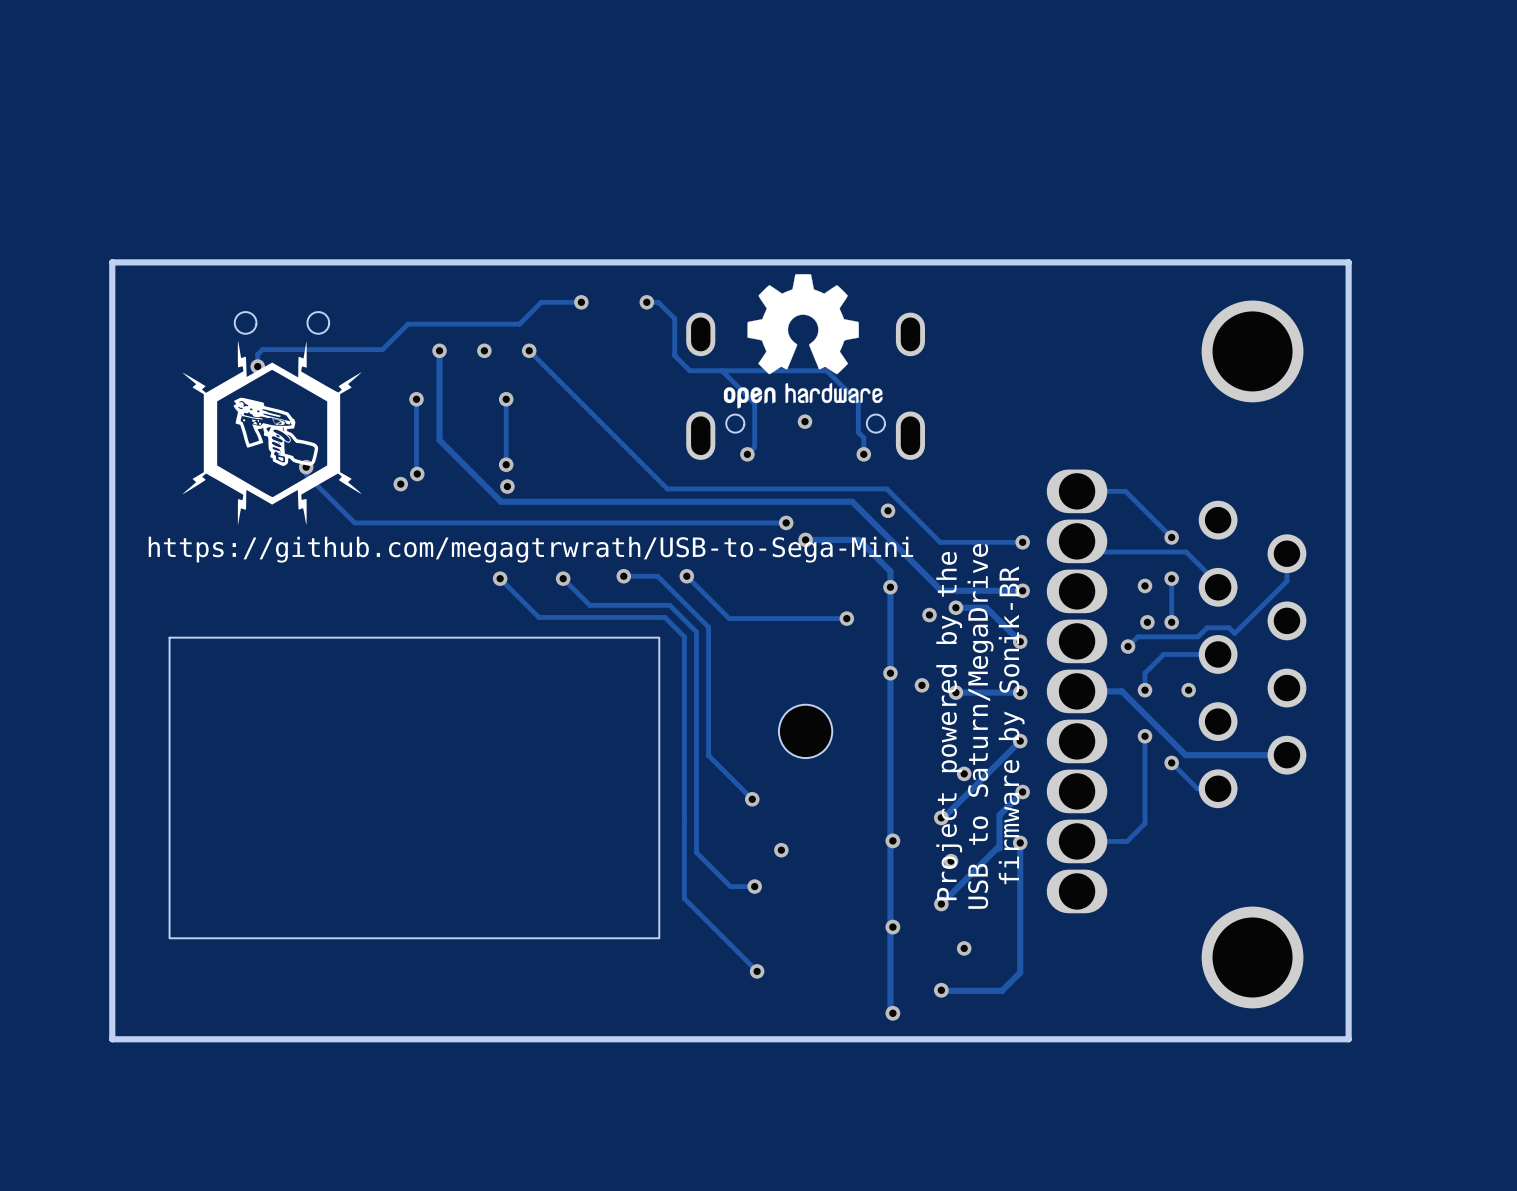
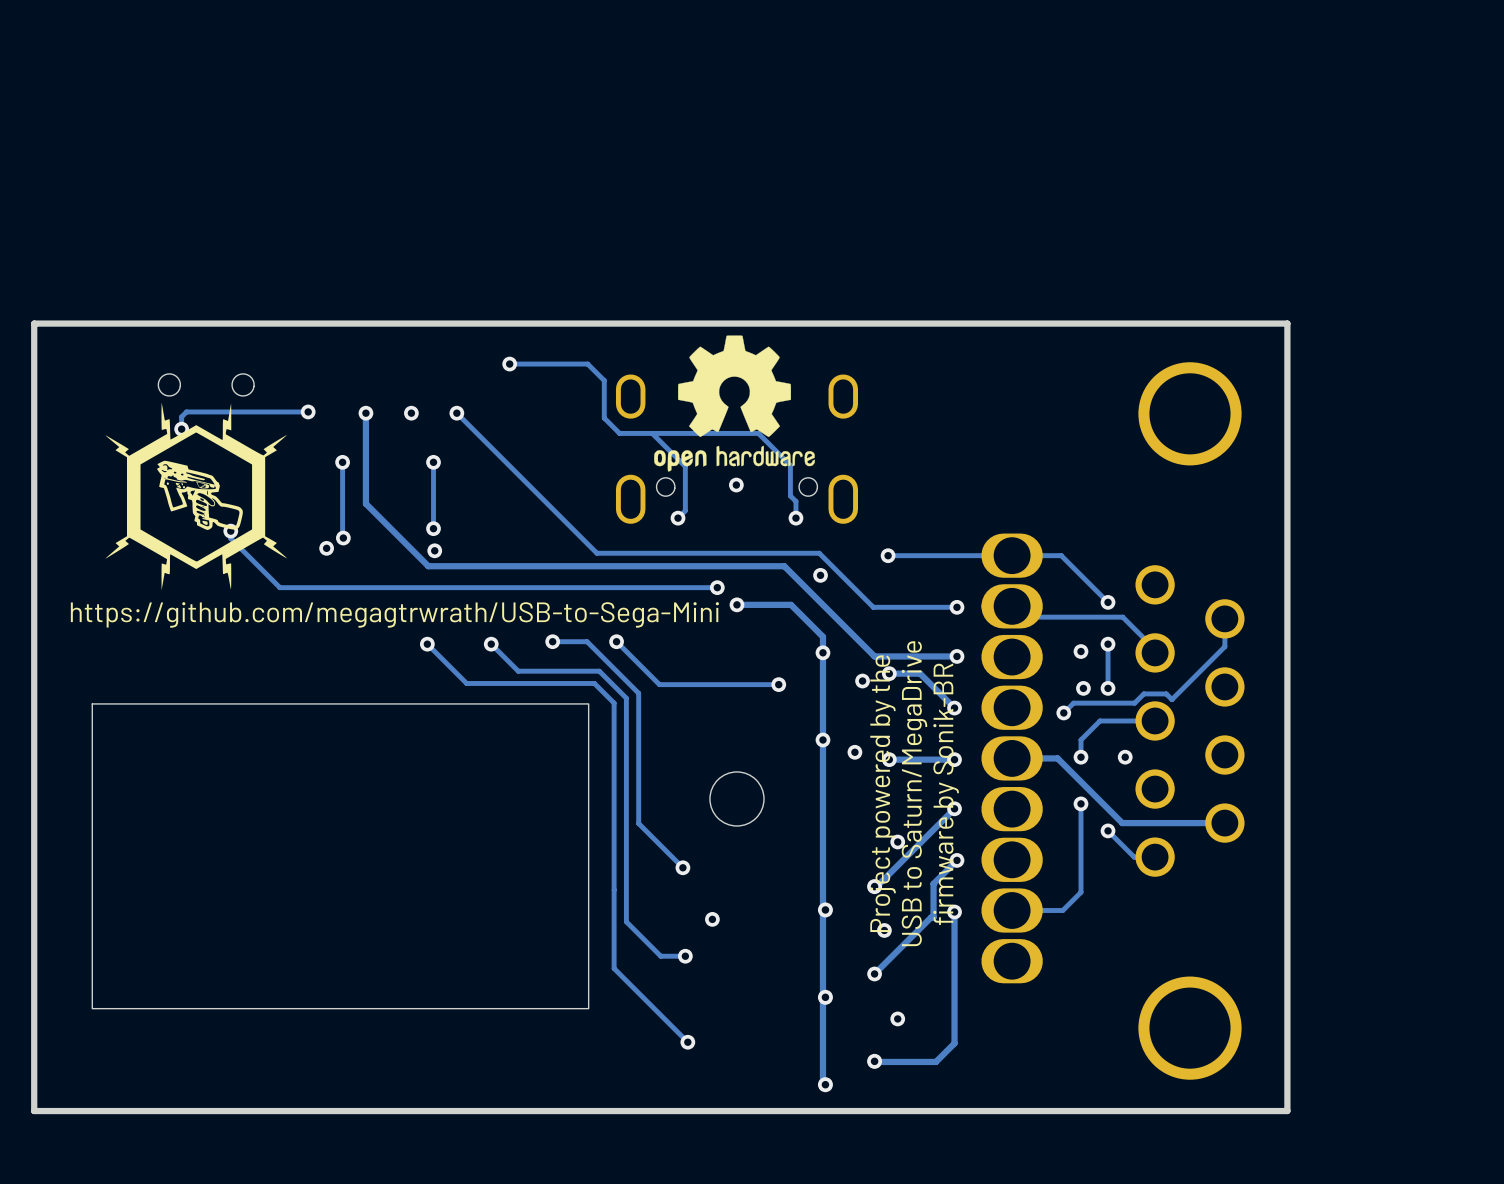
track: (581, 302) (541, 302) (519, 324) (408, 324) (382, 349) -> (509, 364) (576, 364)
via: (646, 302) -> none
via: none -> (308, 411)
via: none -> (888, 555)
track: none -> (1012, 555) (888, 555)

